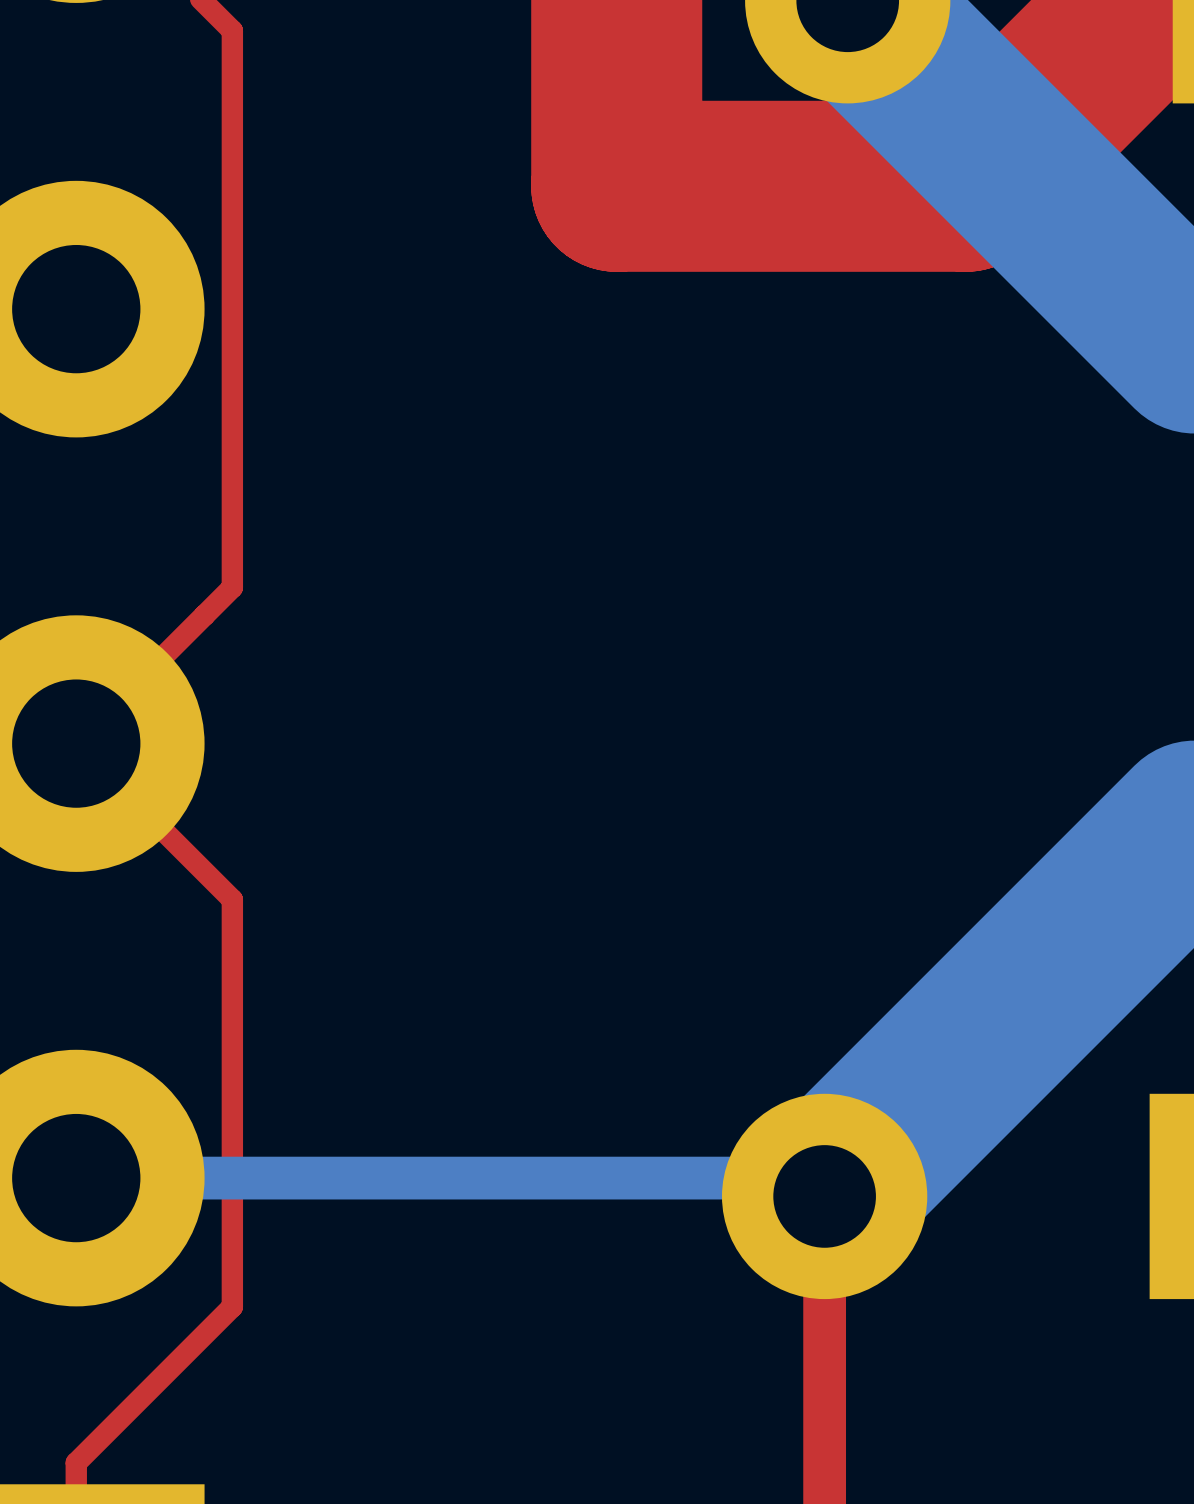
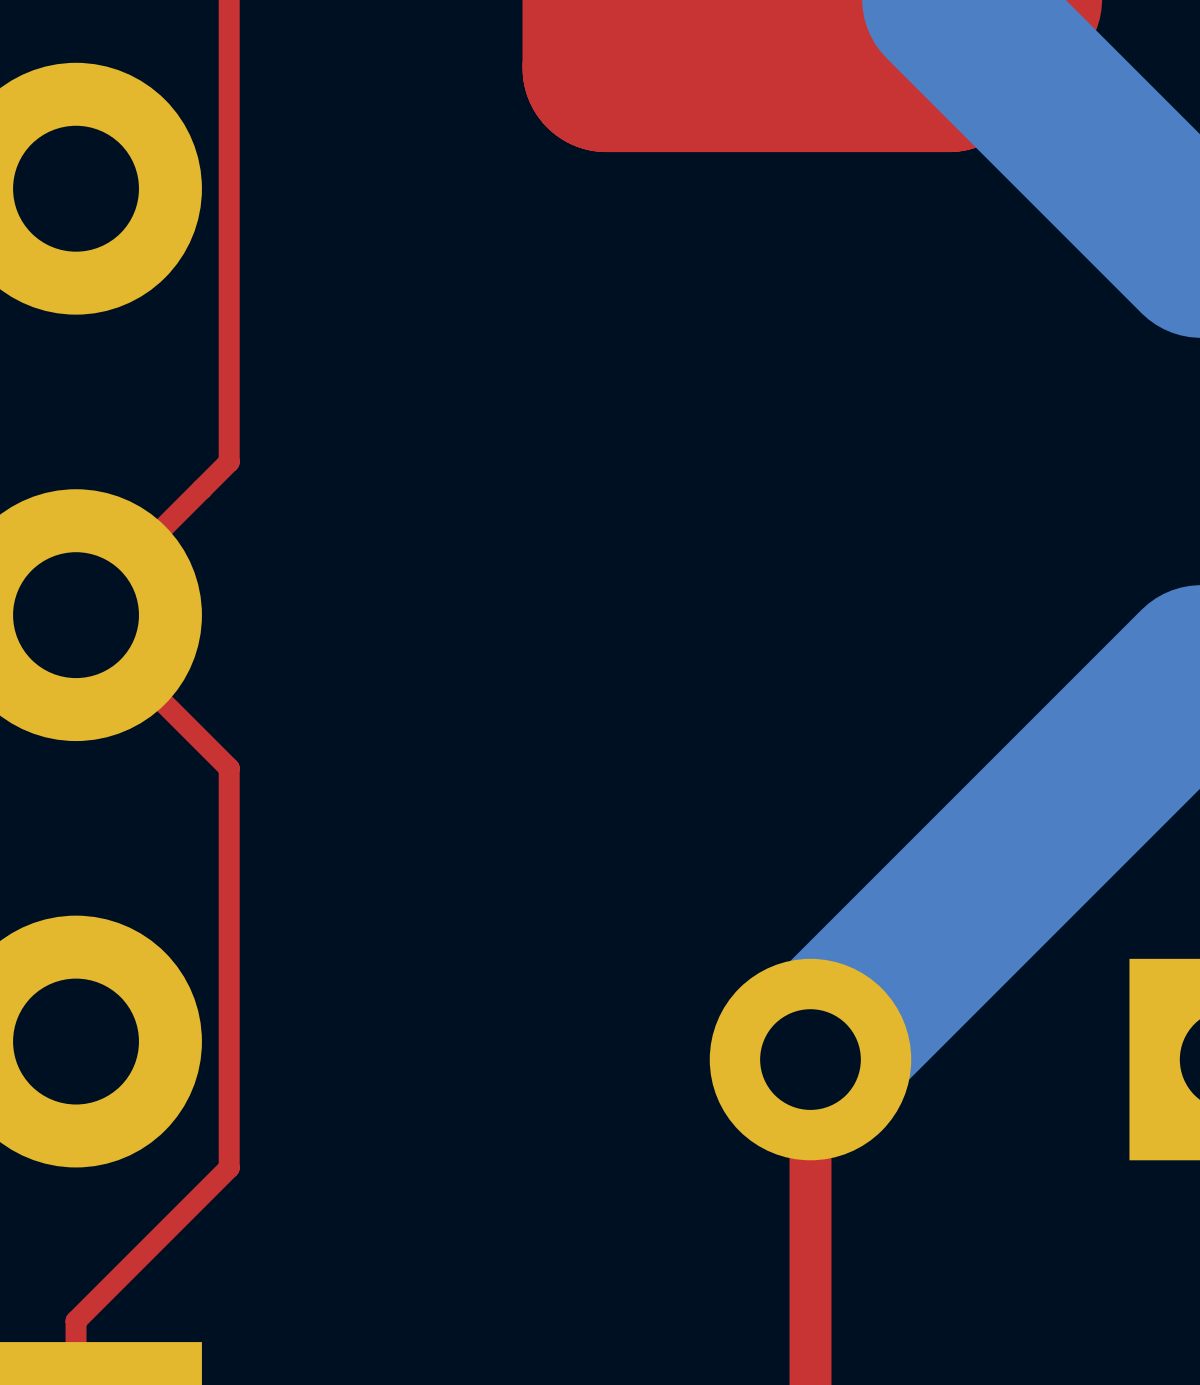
bottom track: (76, 1178) (806, 1178) (824, 1196) -> none

